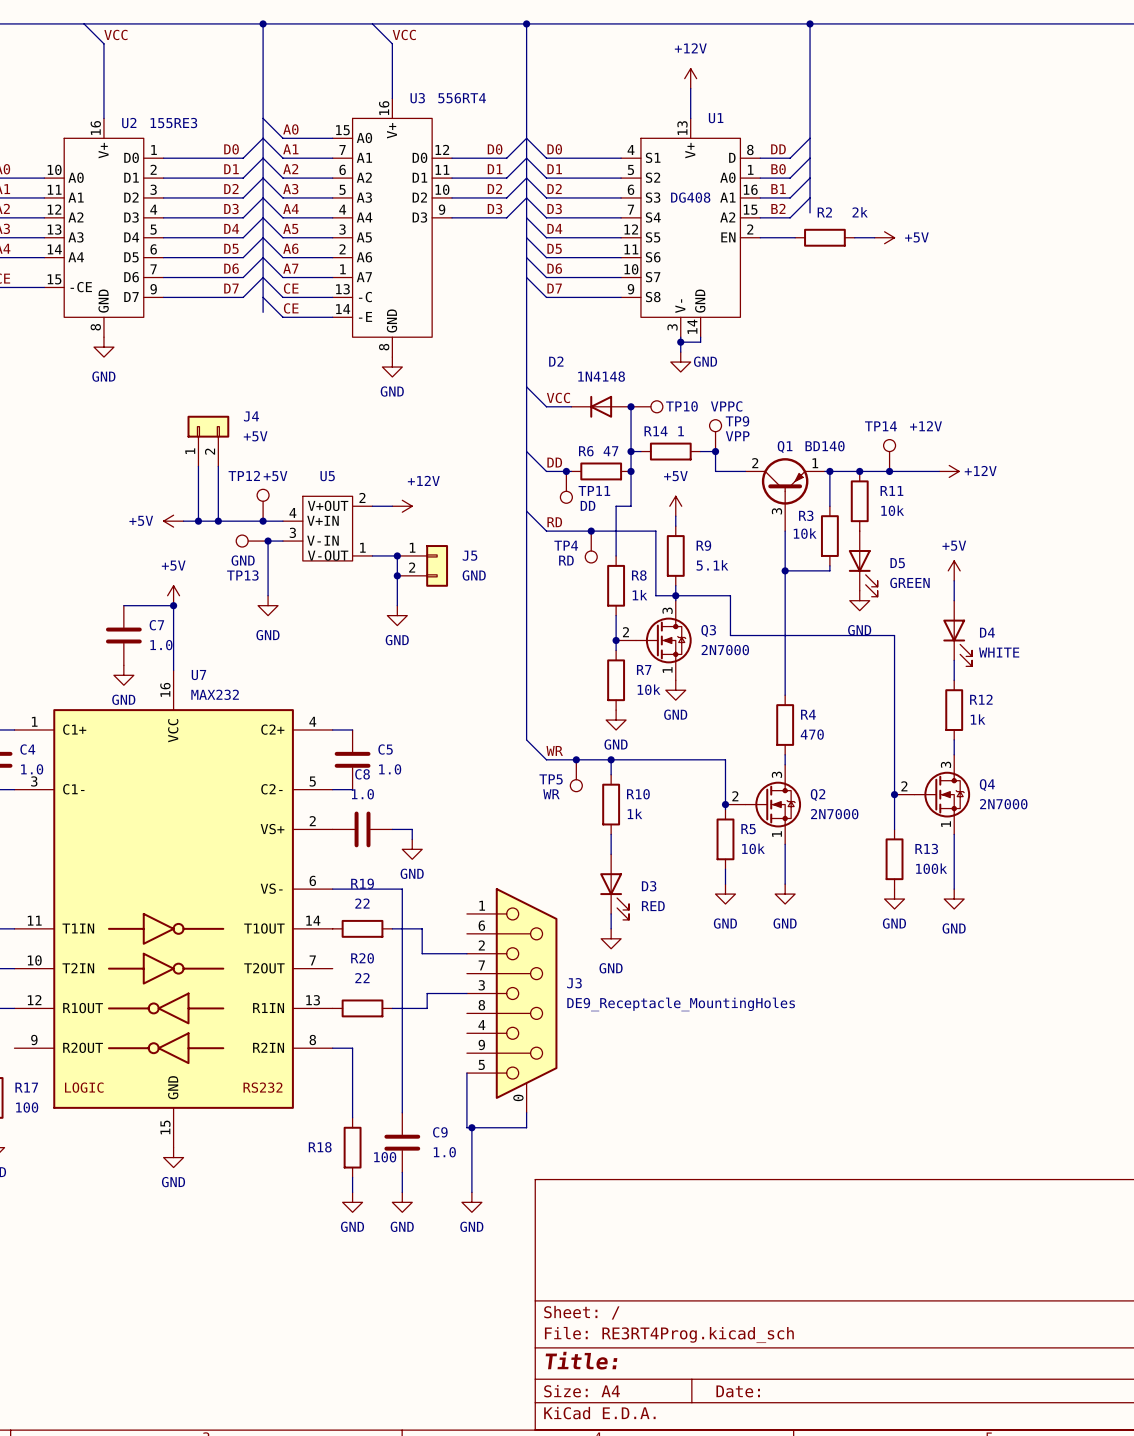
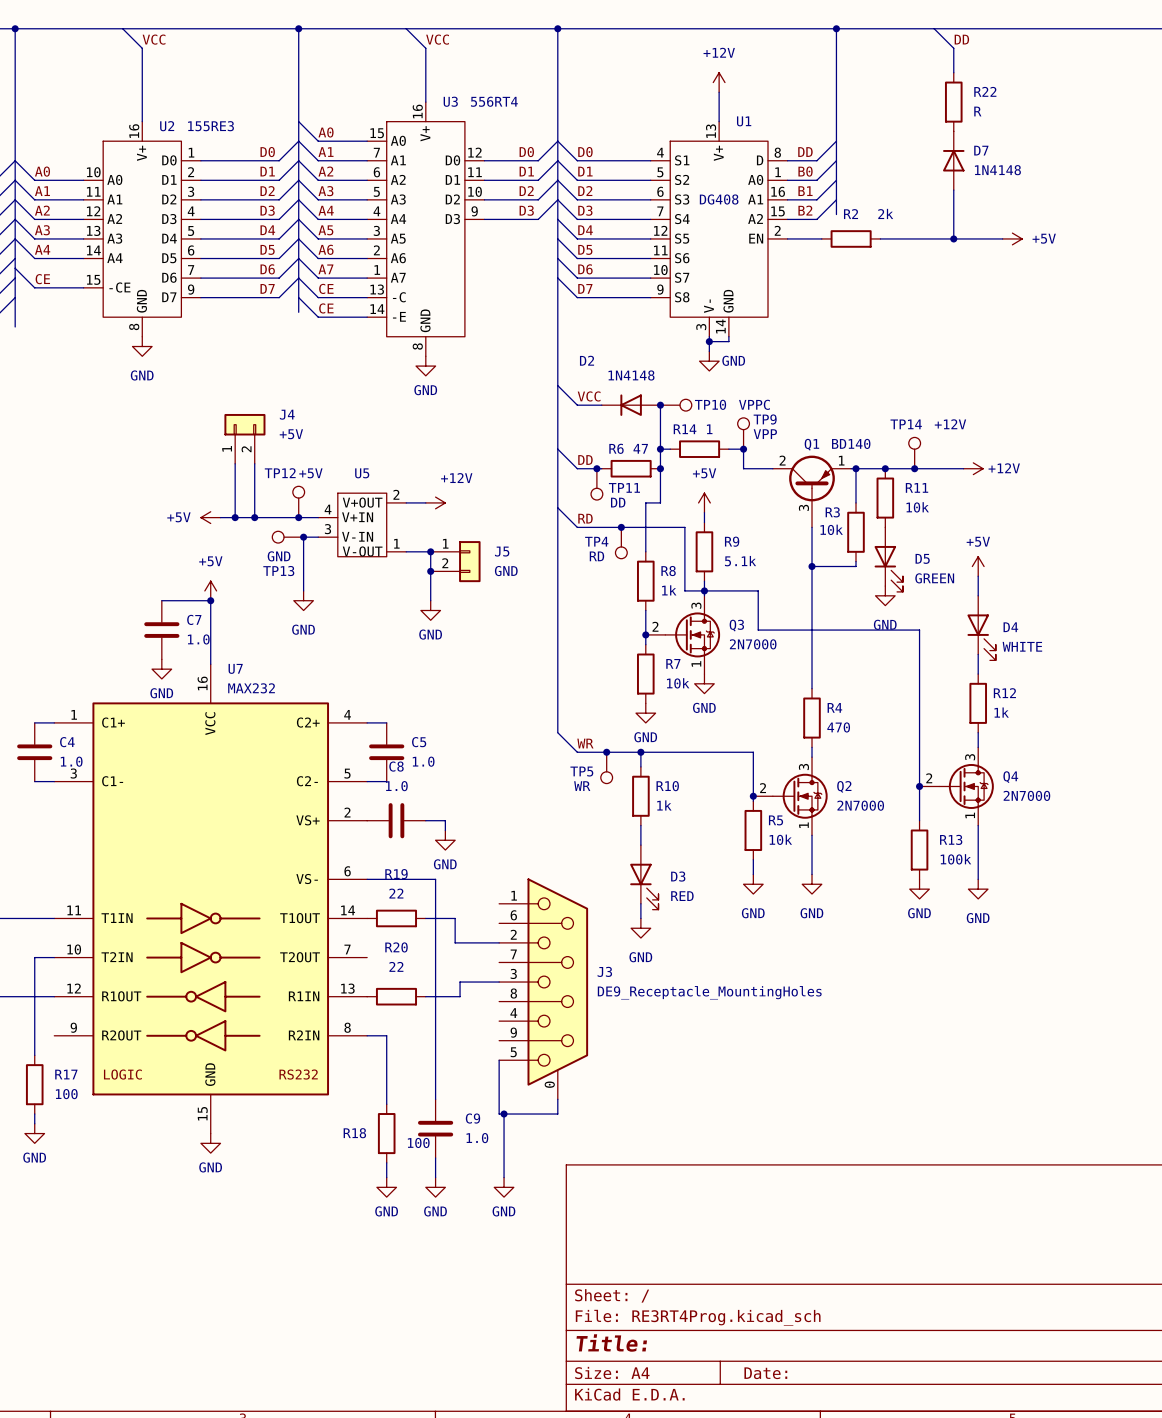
wire: none -> (934, 28) (953, 48) (953, 72)
label: none -> DD (961, 39)
R22: none -> R (953, 102)
D7: none -> 1N4148 (953, 160)
wire: none -> (953, 190) (953, 238)
wire: none -> (899, 238) (1002, 238)
power symbol position: +5V (884, 237) -> +5V (1012, 238)
junction: none -> (953, 238)

